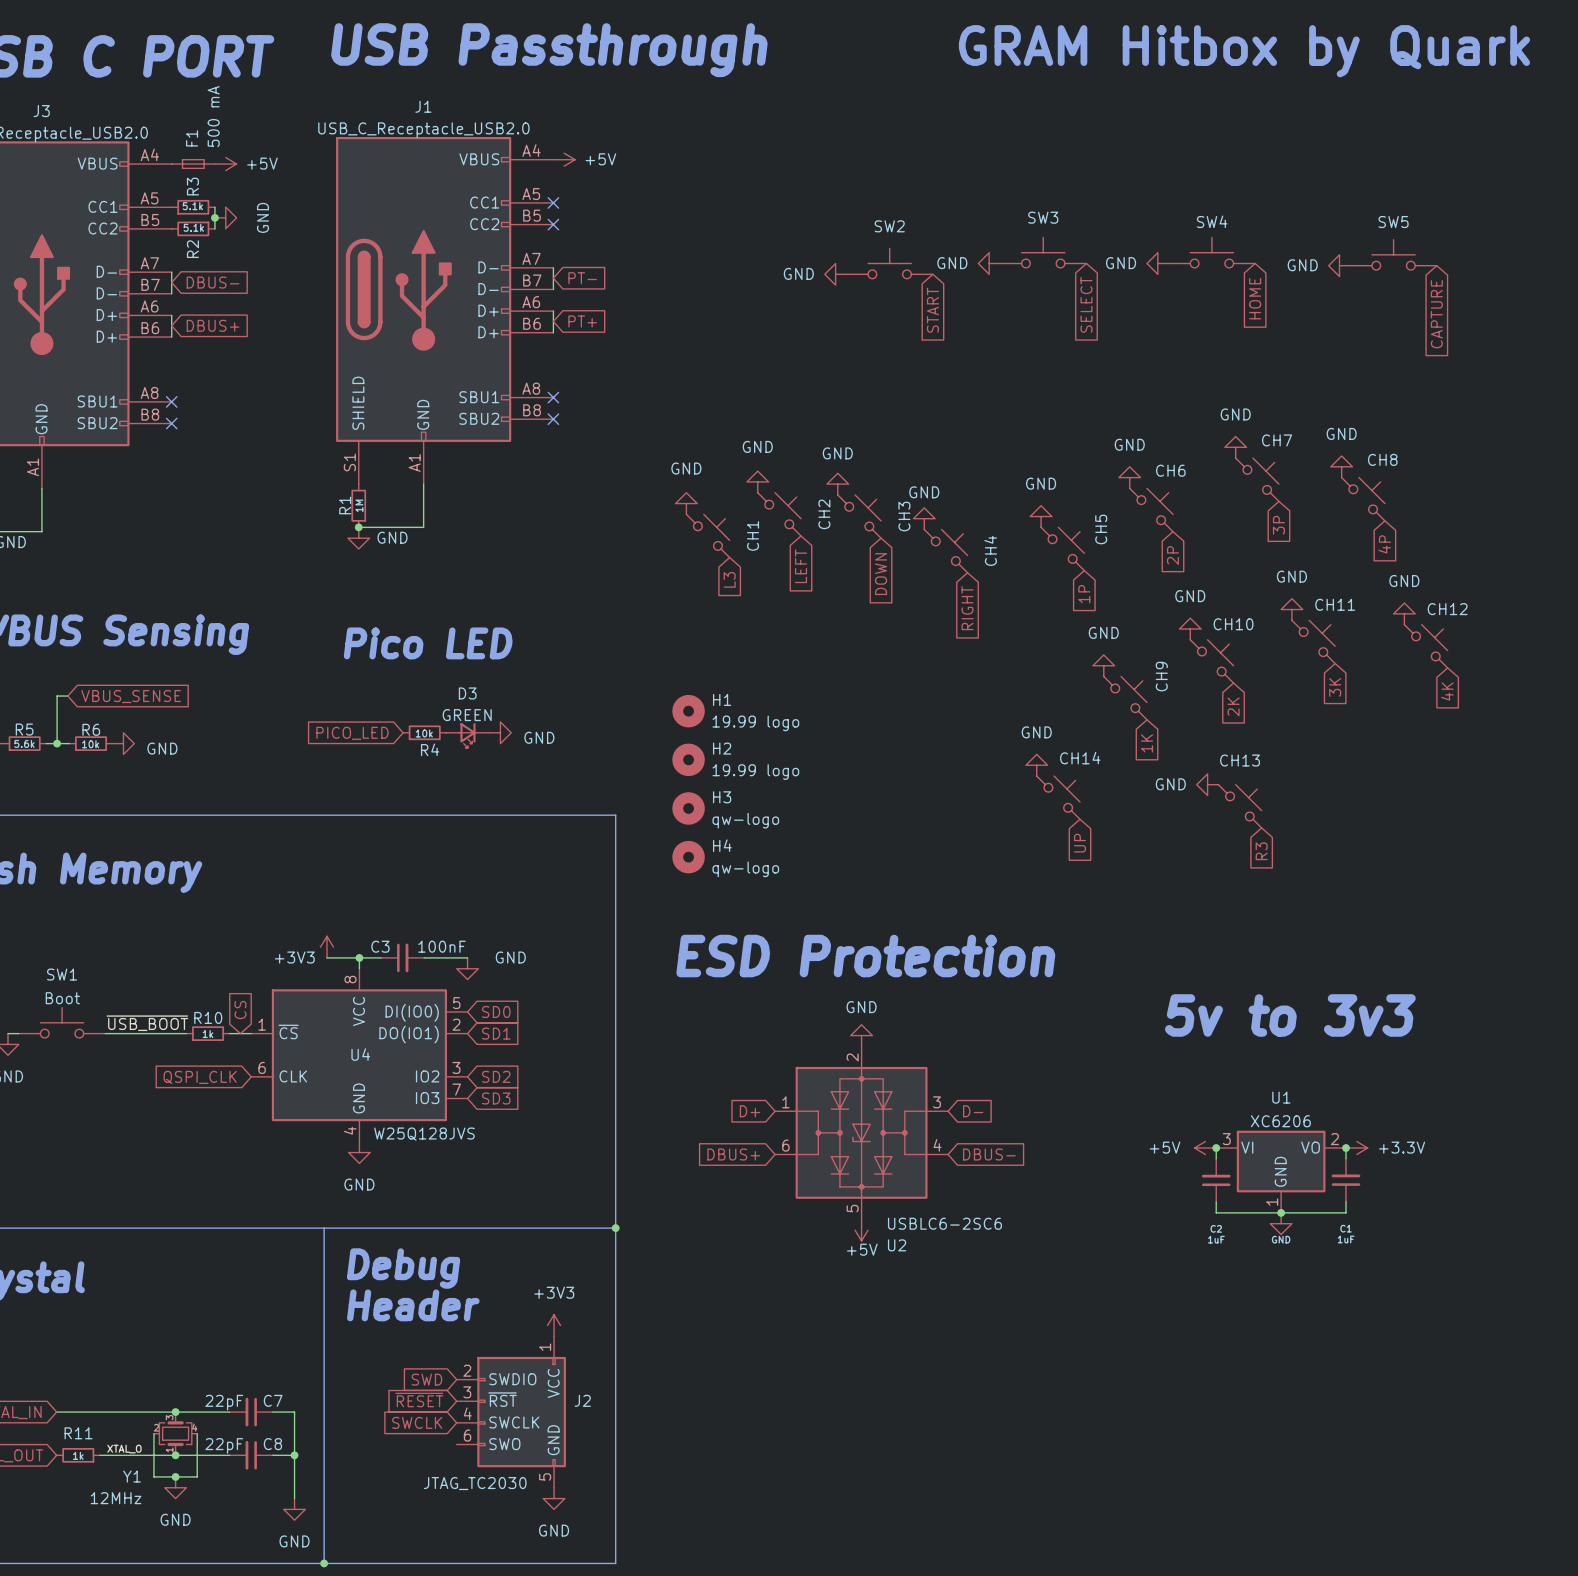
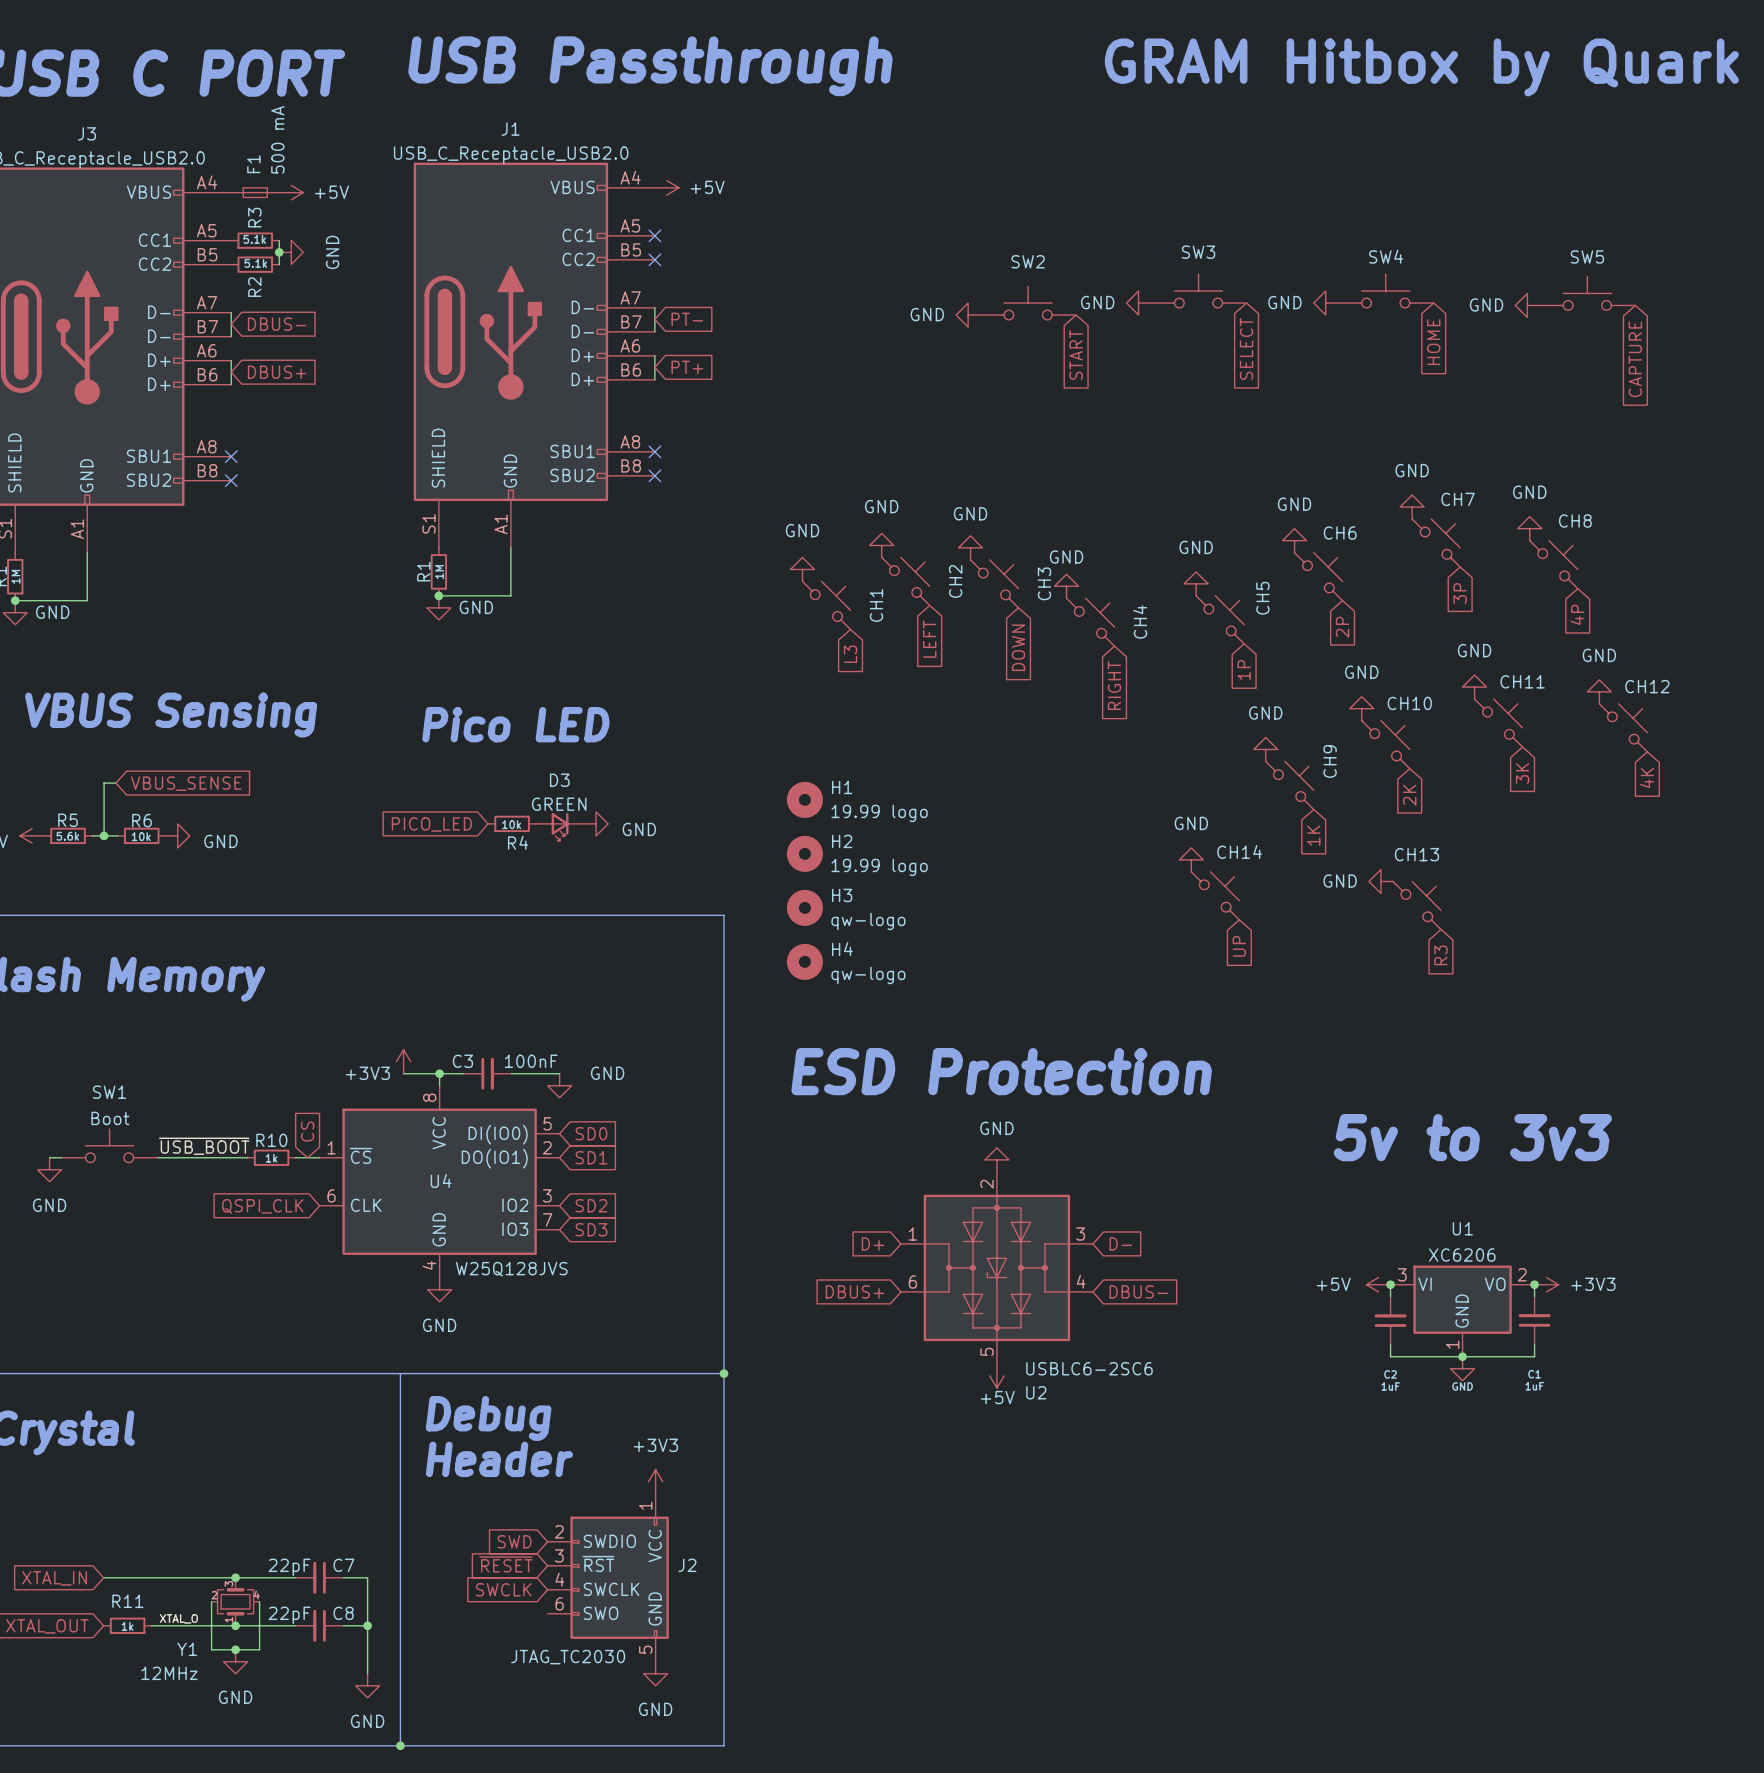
power symbol: +3.3V (1356, 1148) -> +3V3 (1546, 1284)

